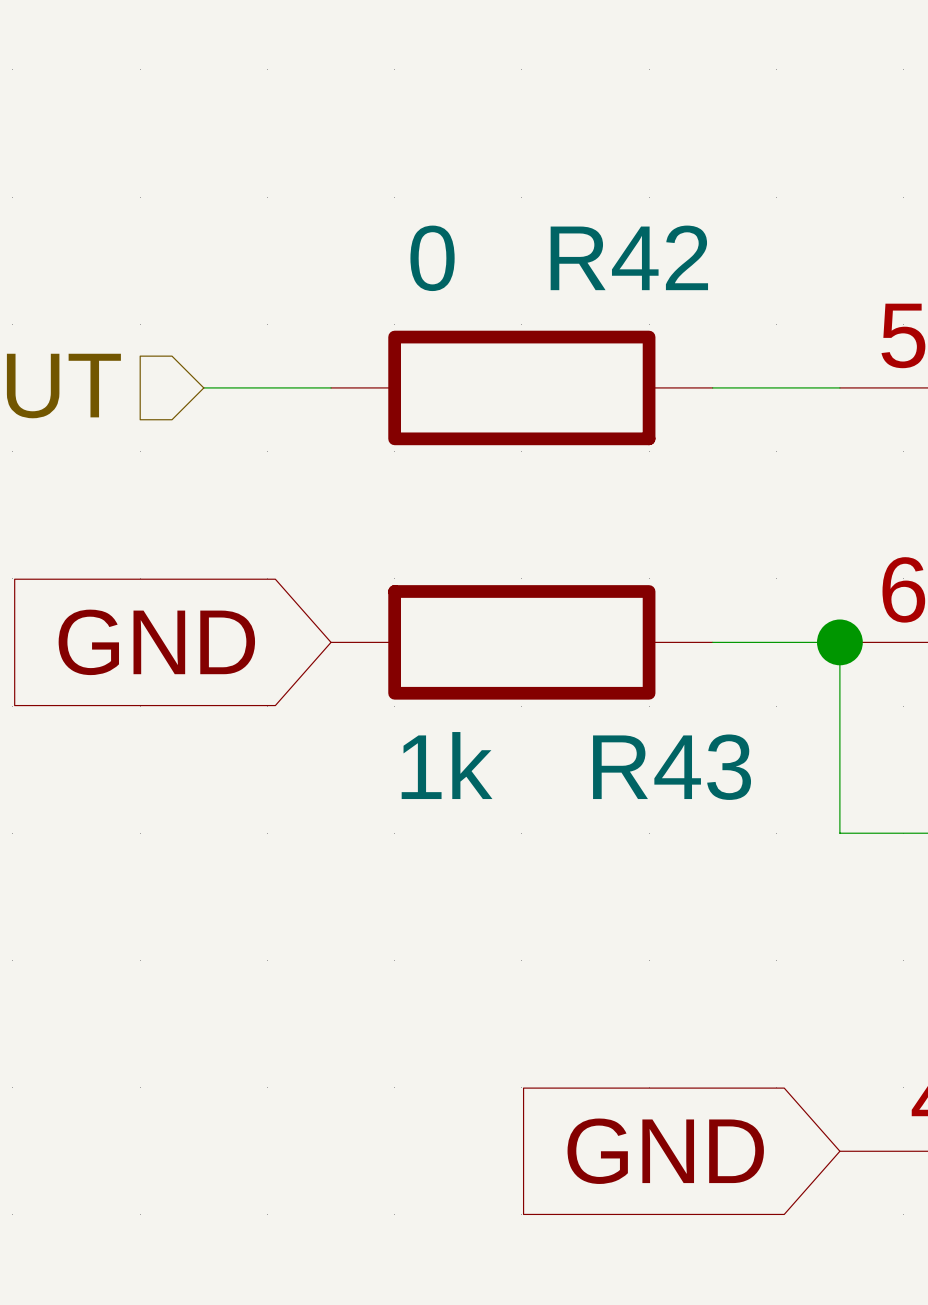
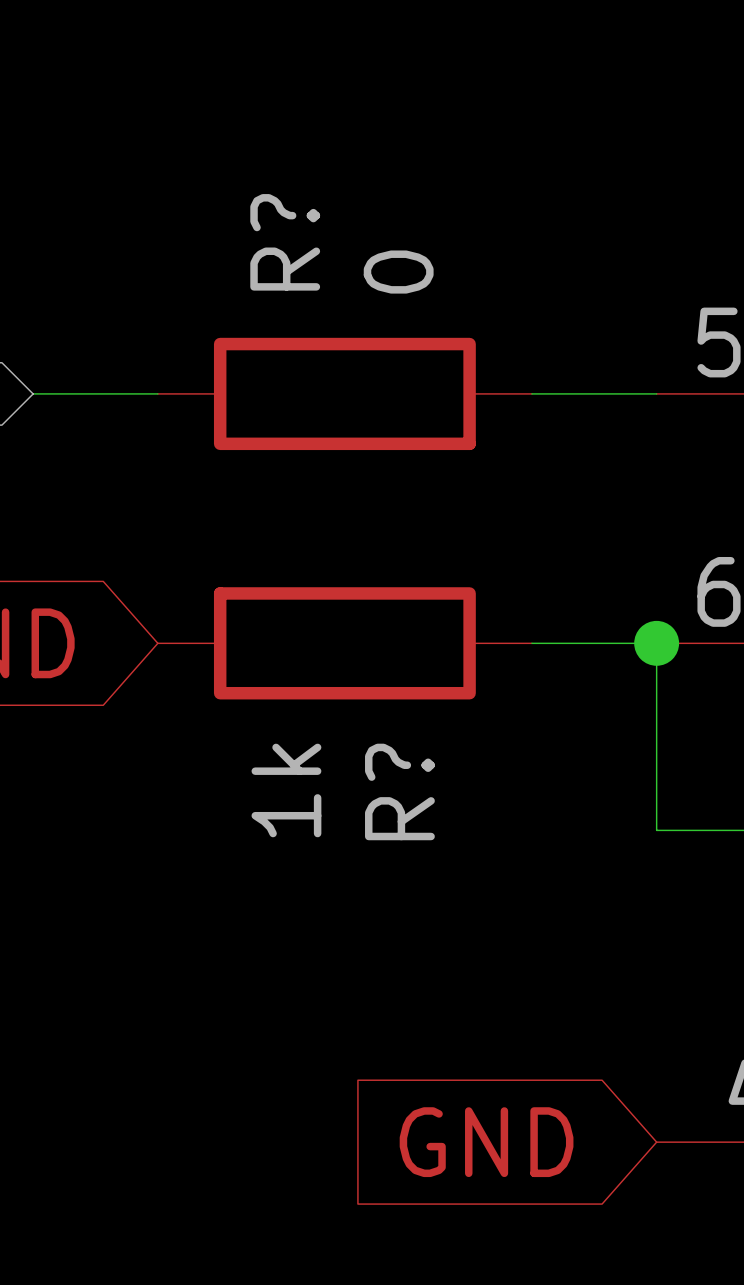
R42 name: R42 (629, 257) -> R? (285, 242)
R42 value rotation: 0° (432, 258) -> 90° counterclockwise (398, 272)
R42 value position: 0 (432, 258) -> 0 (398, 272)
R43 value rotation: 0° (447, 765) -> 90° counterclockwise (286, 790)
R43 name: R43 (672, 767) -> R? (399, 791)

